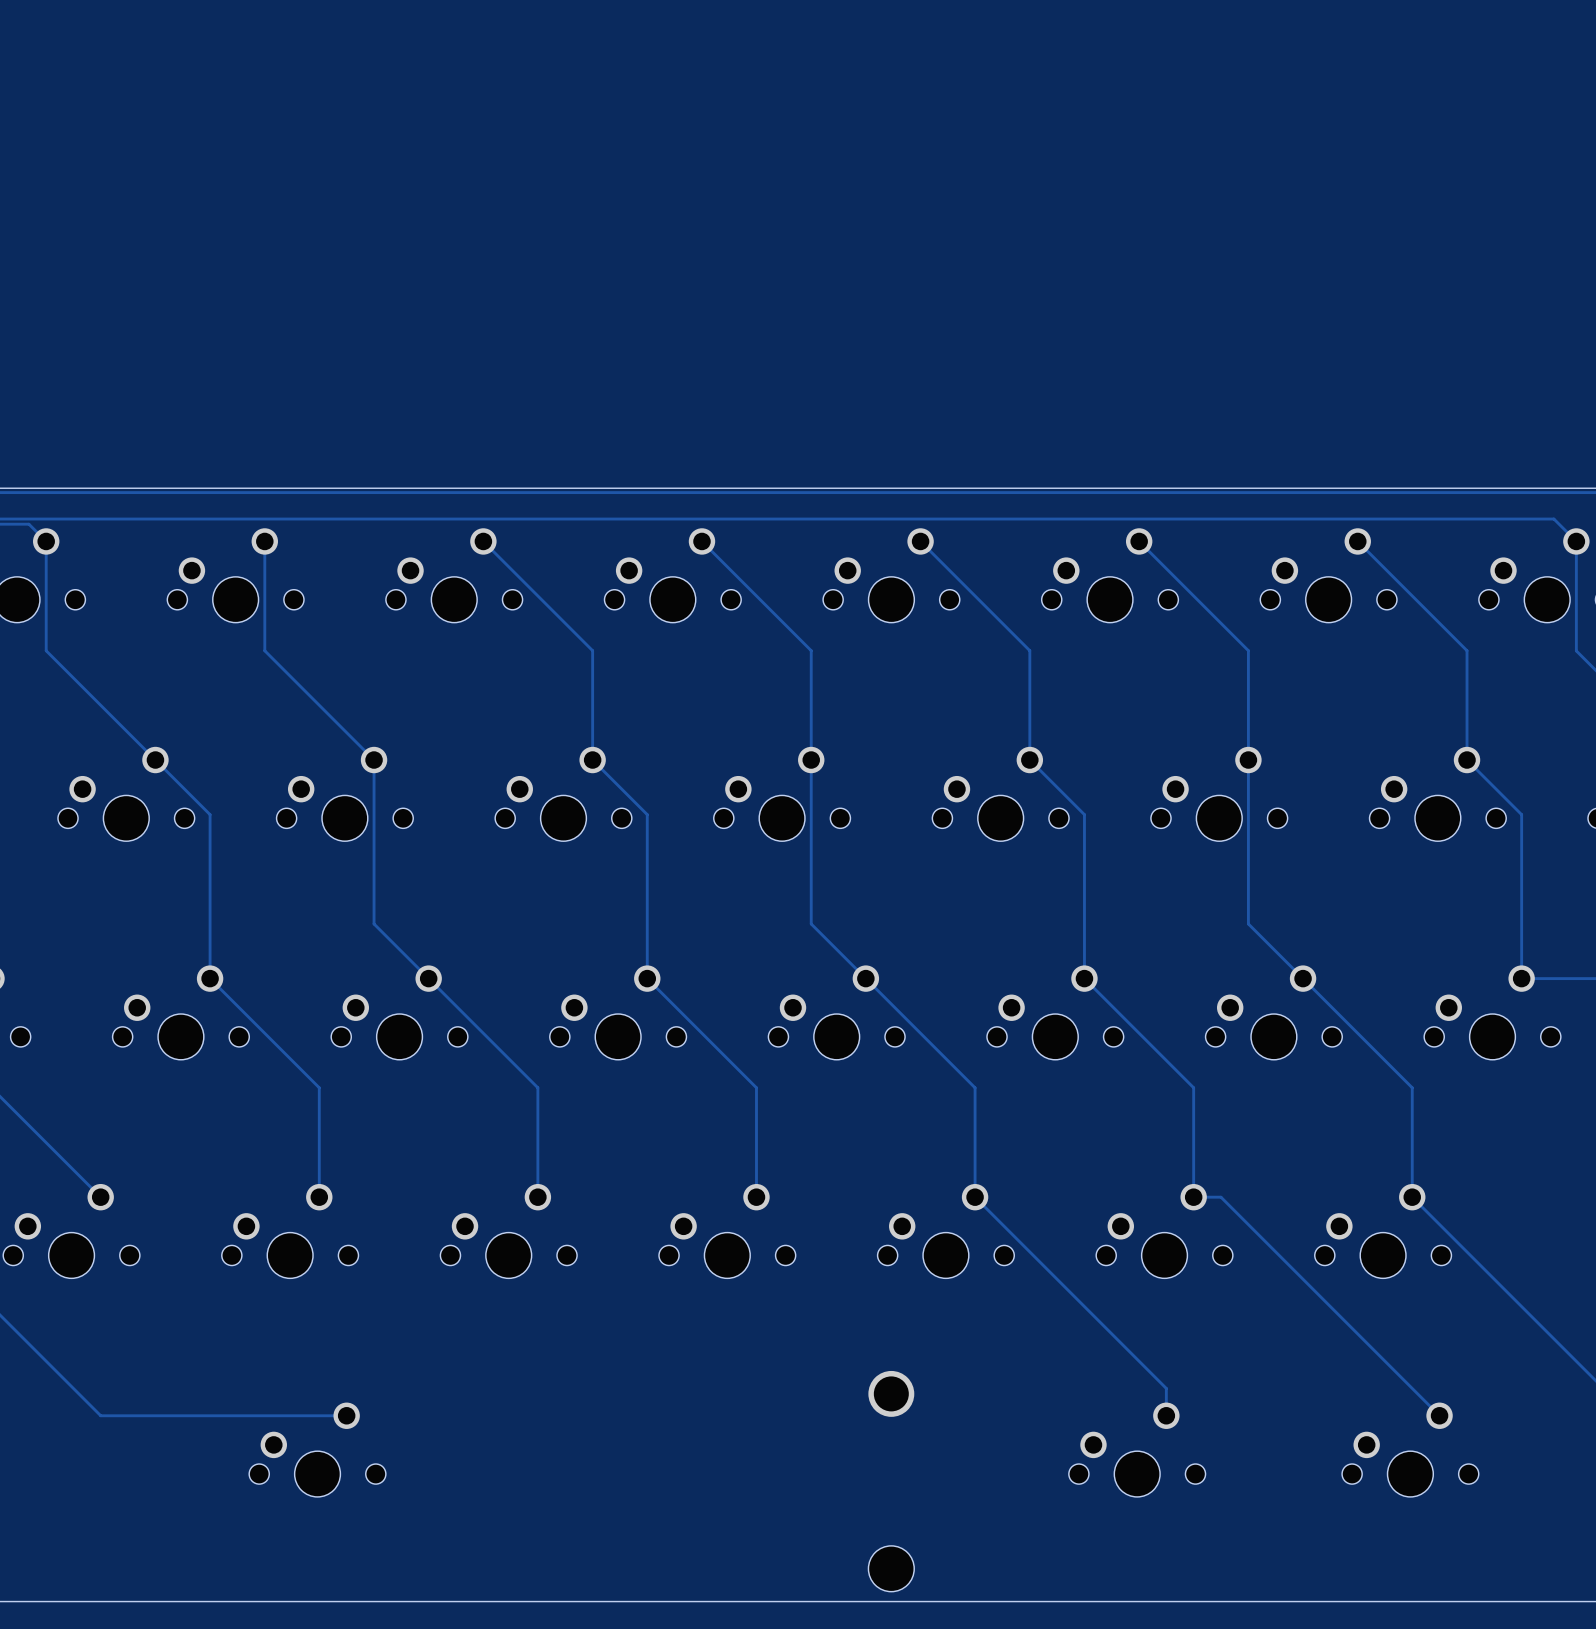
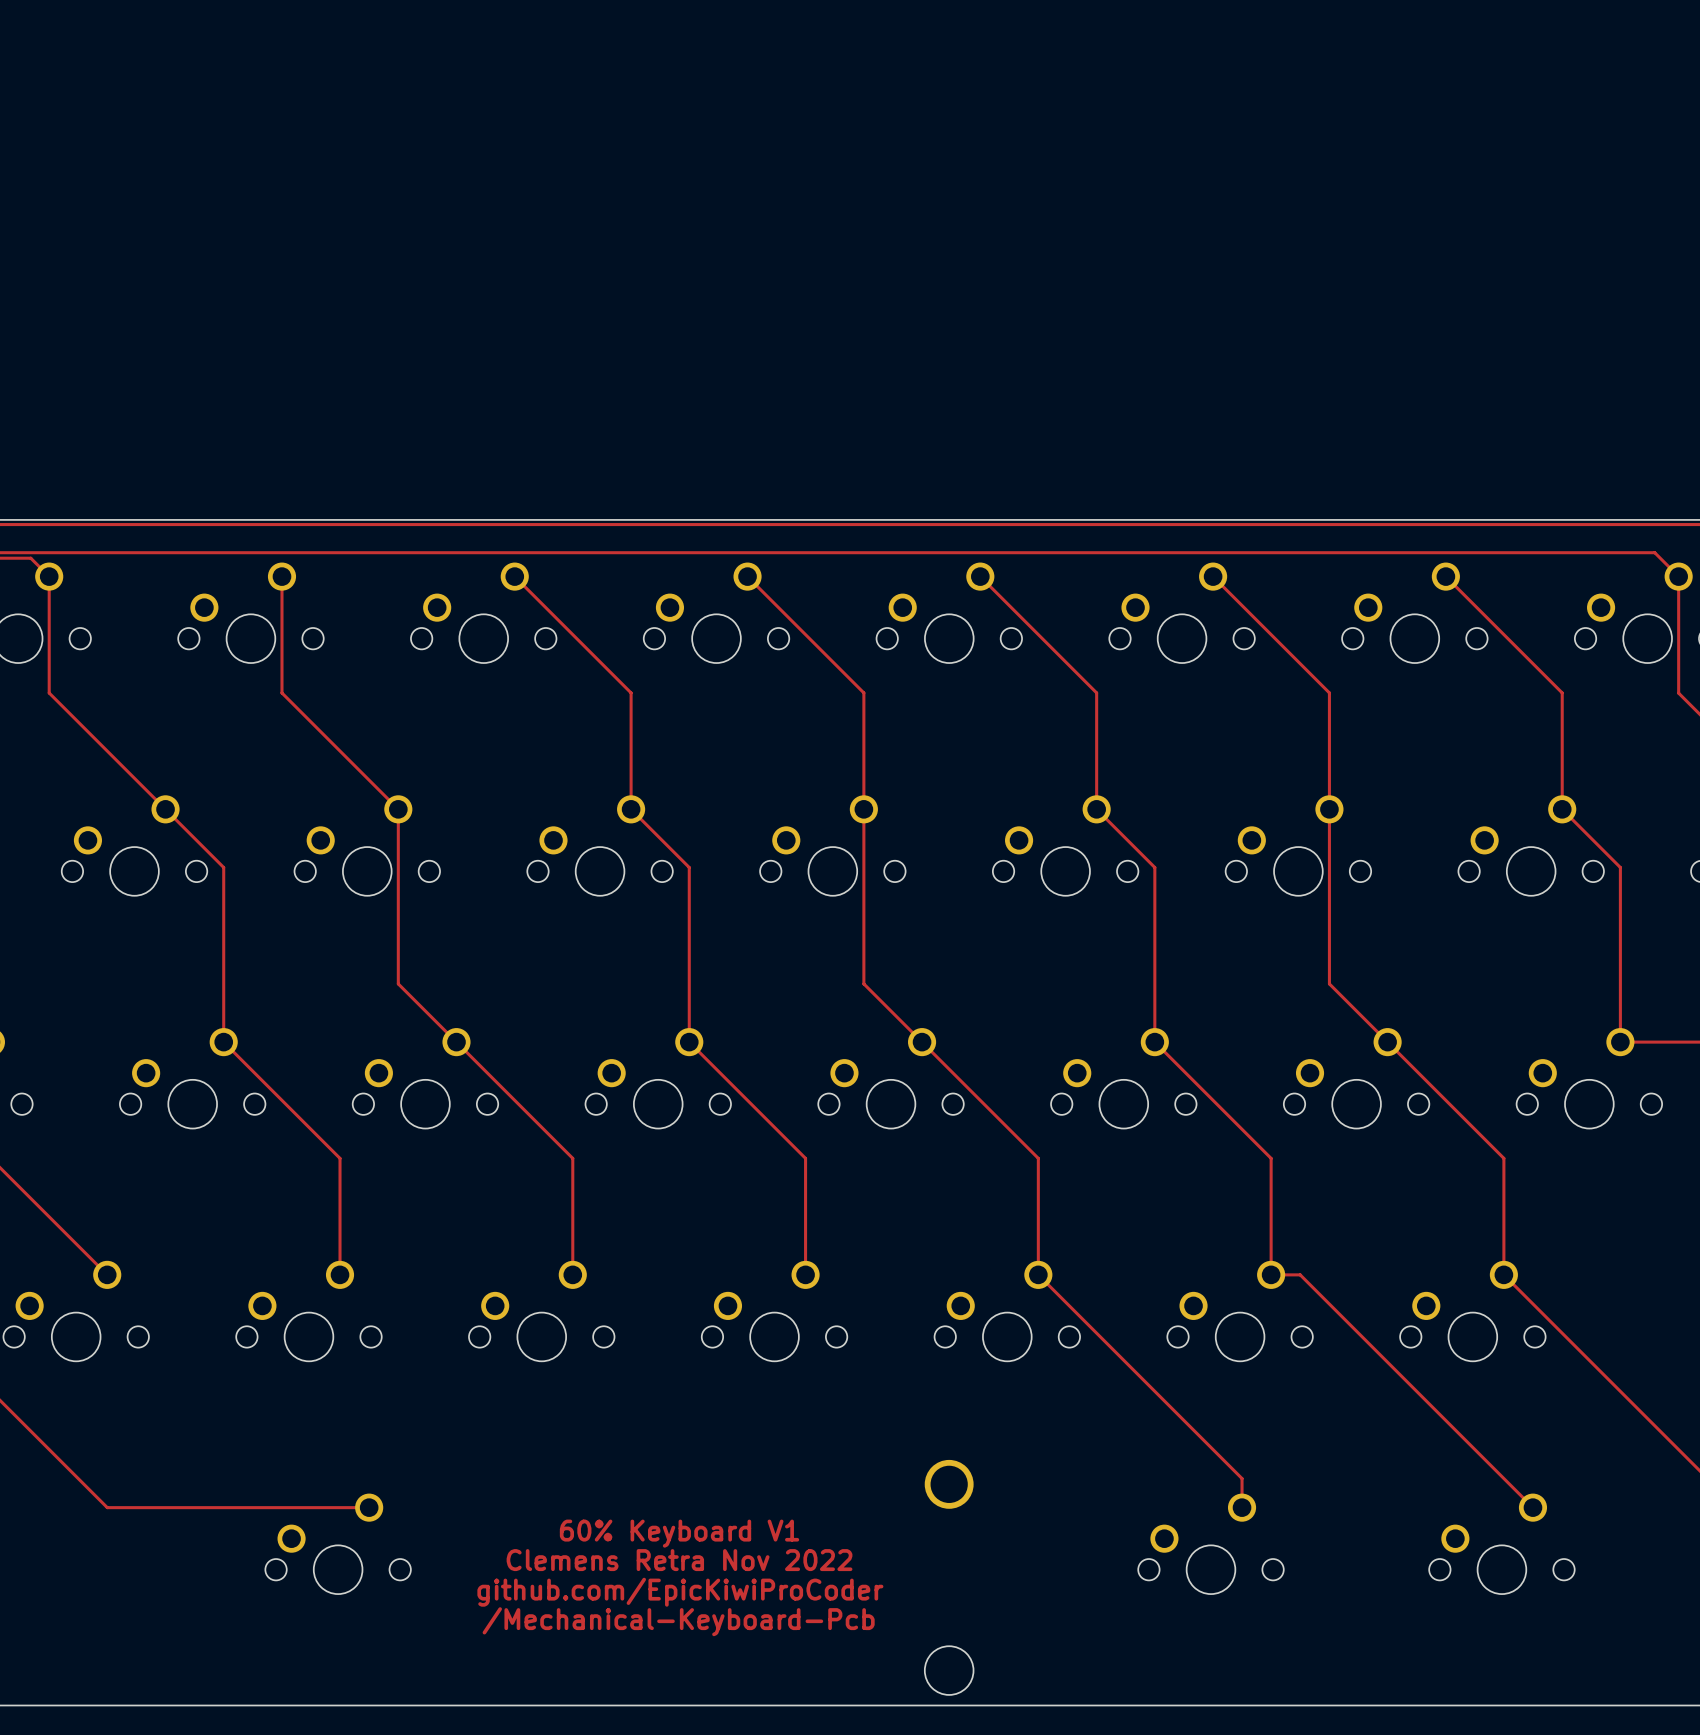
text: none -> 60% Keyboard V1 (679, 1533)
text: none -> Clemens Retra Nov 2022 (679, 1560)
text: none -> github.com/EpicKiwiProCoder (680, 1592)
text: none -> /Mechanical-Keyboard-Pcb (678, 1621)

